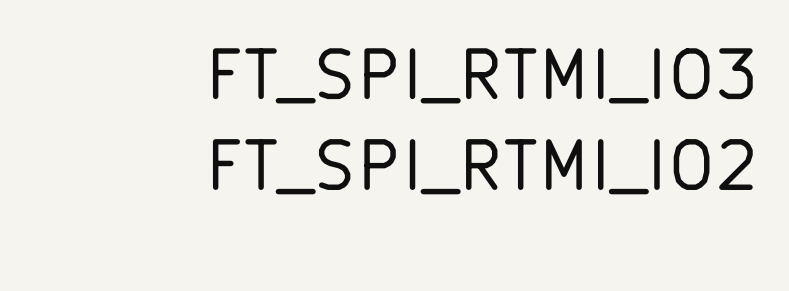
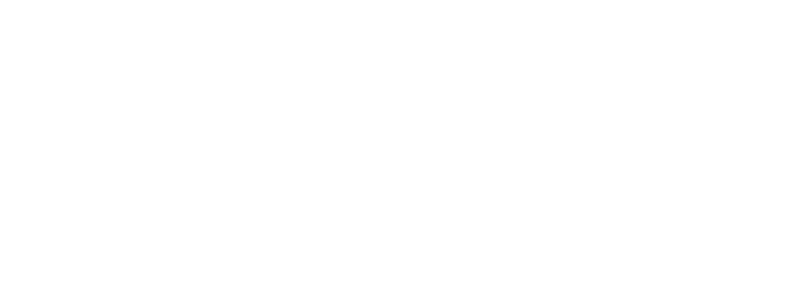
label: FT_SPI_RTMI_IO3 (482, 75) -> none
label: FT_SPI_RTMI_IO2 (482, 166) -> none

